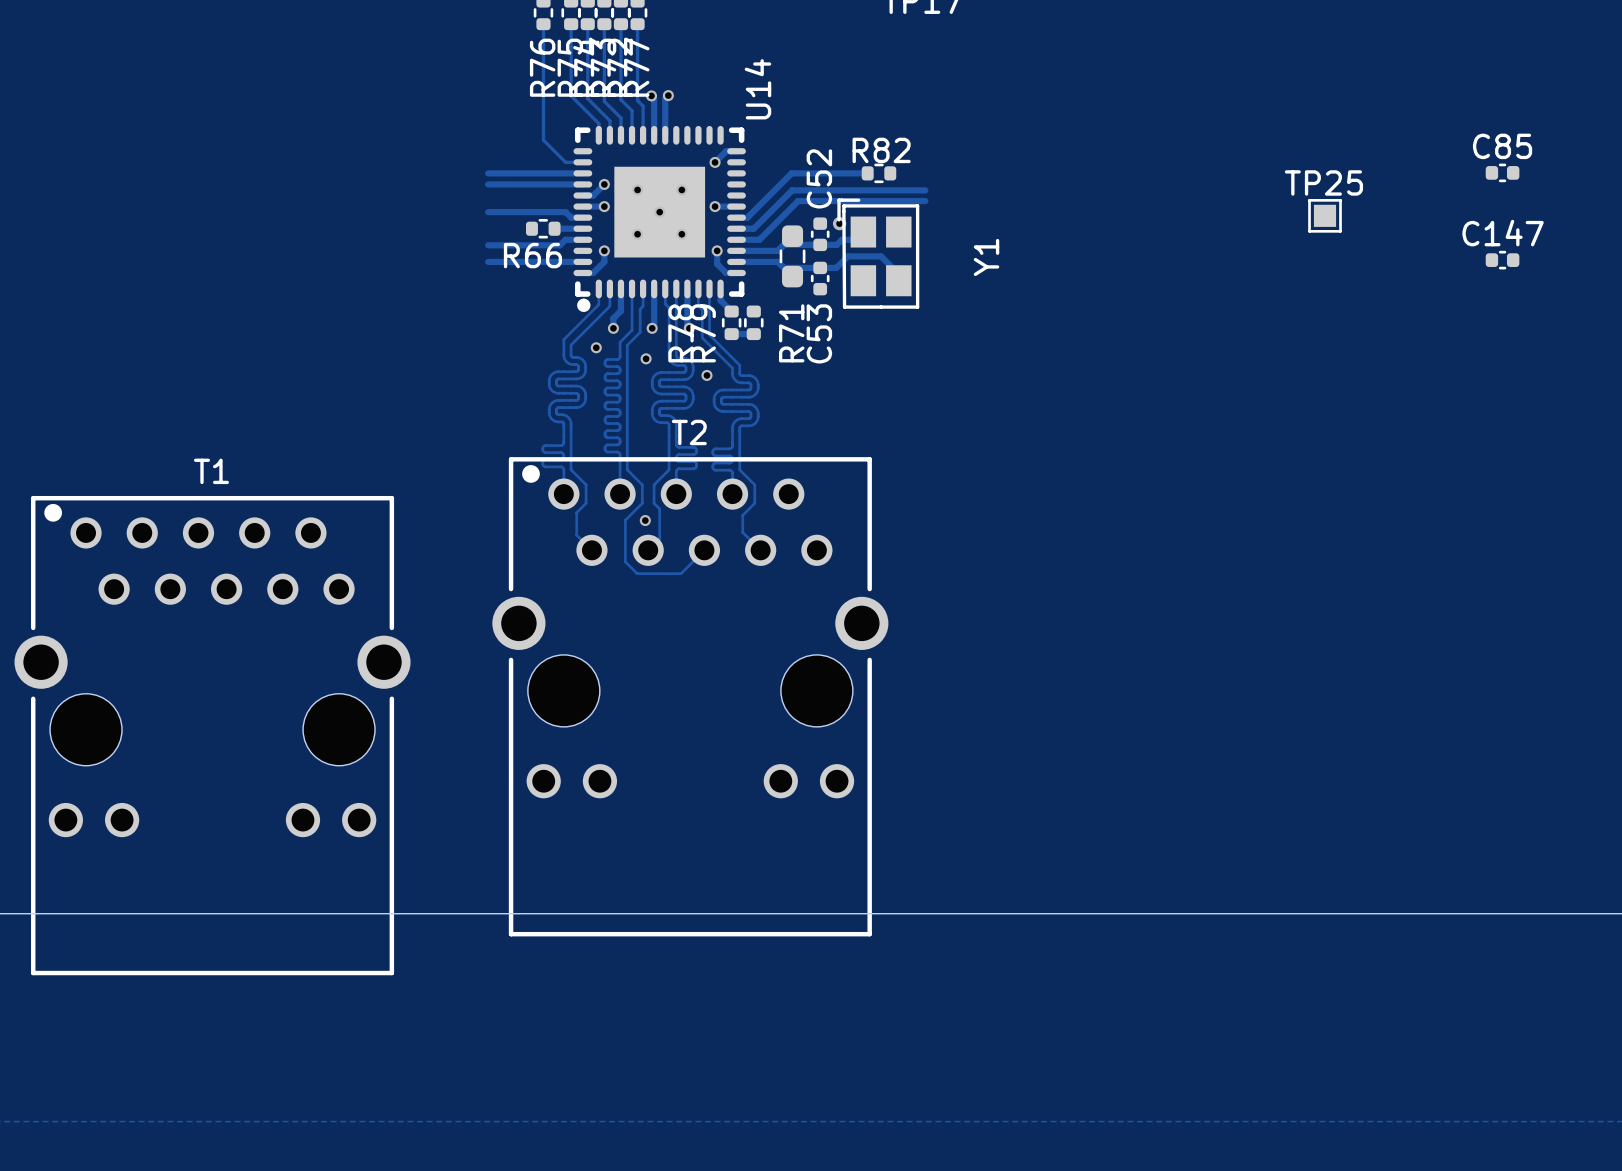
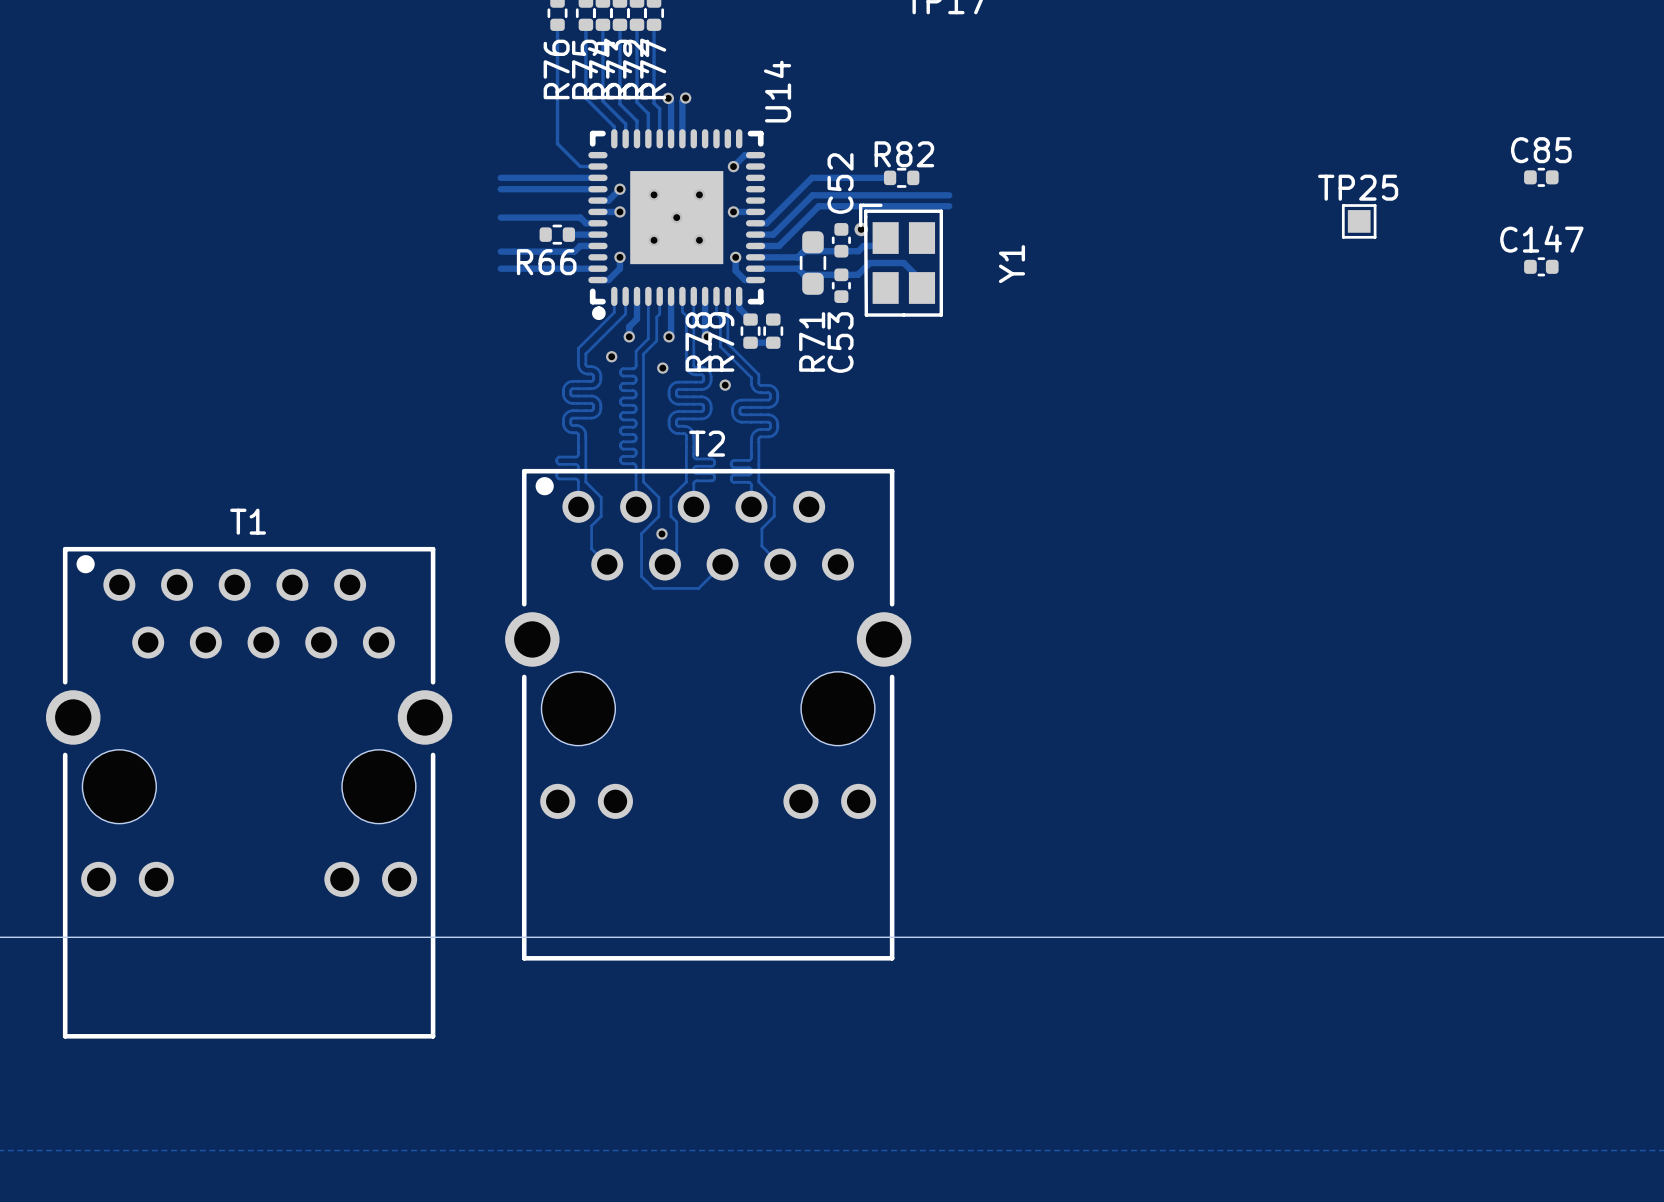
T1 position: (212, 735) -> (249, 792)

